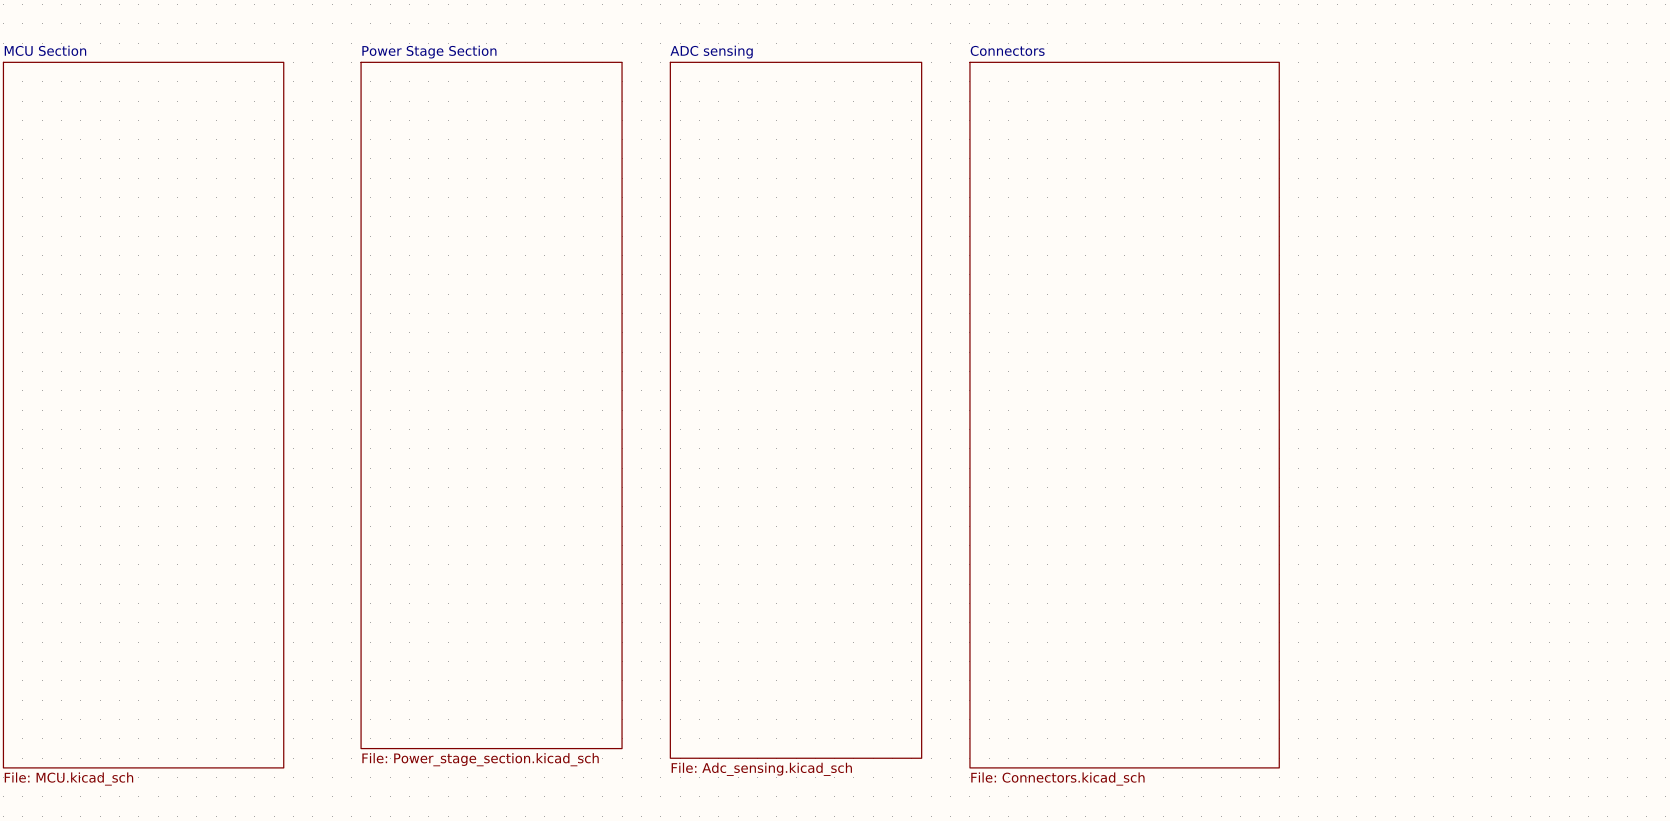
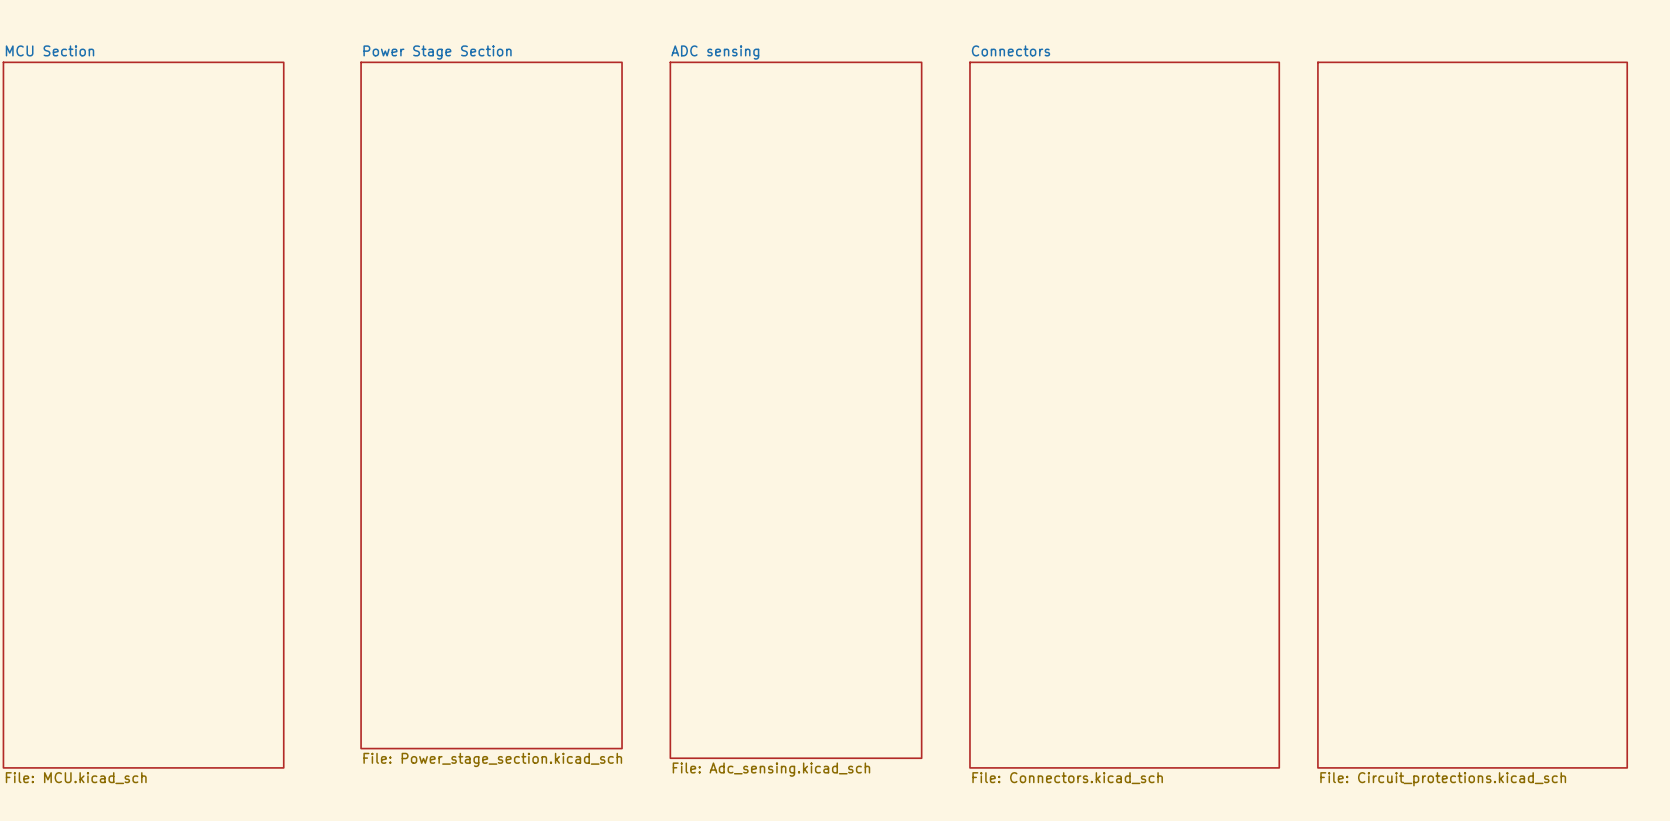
sheet: none -> File: Circuit_protections.kicad_sch (1472, 415)

